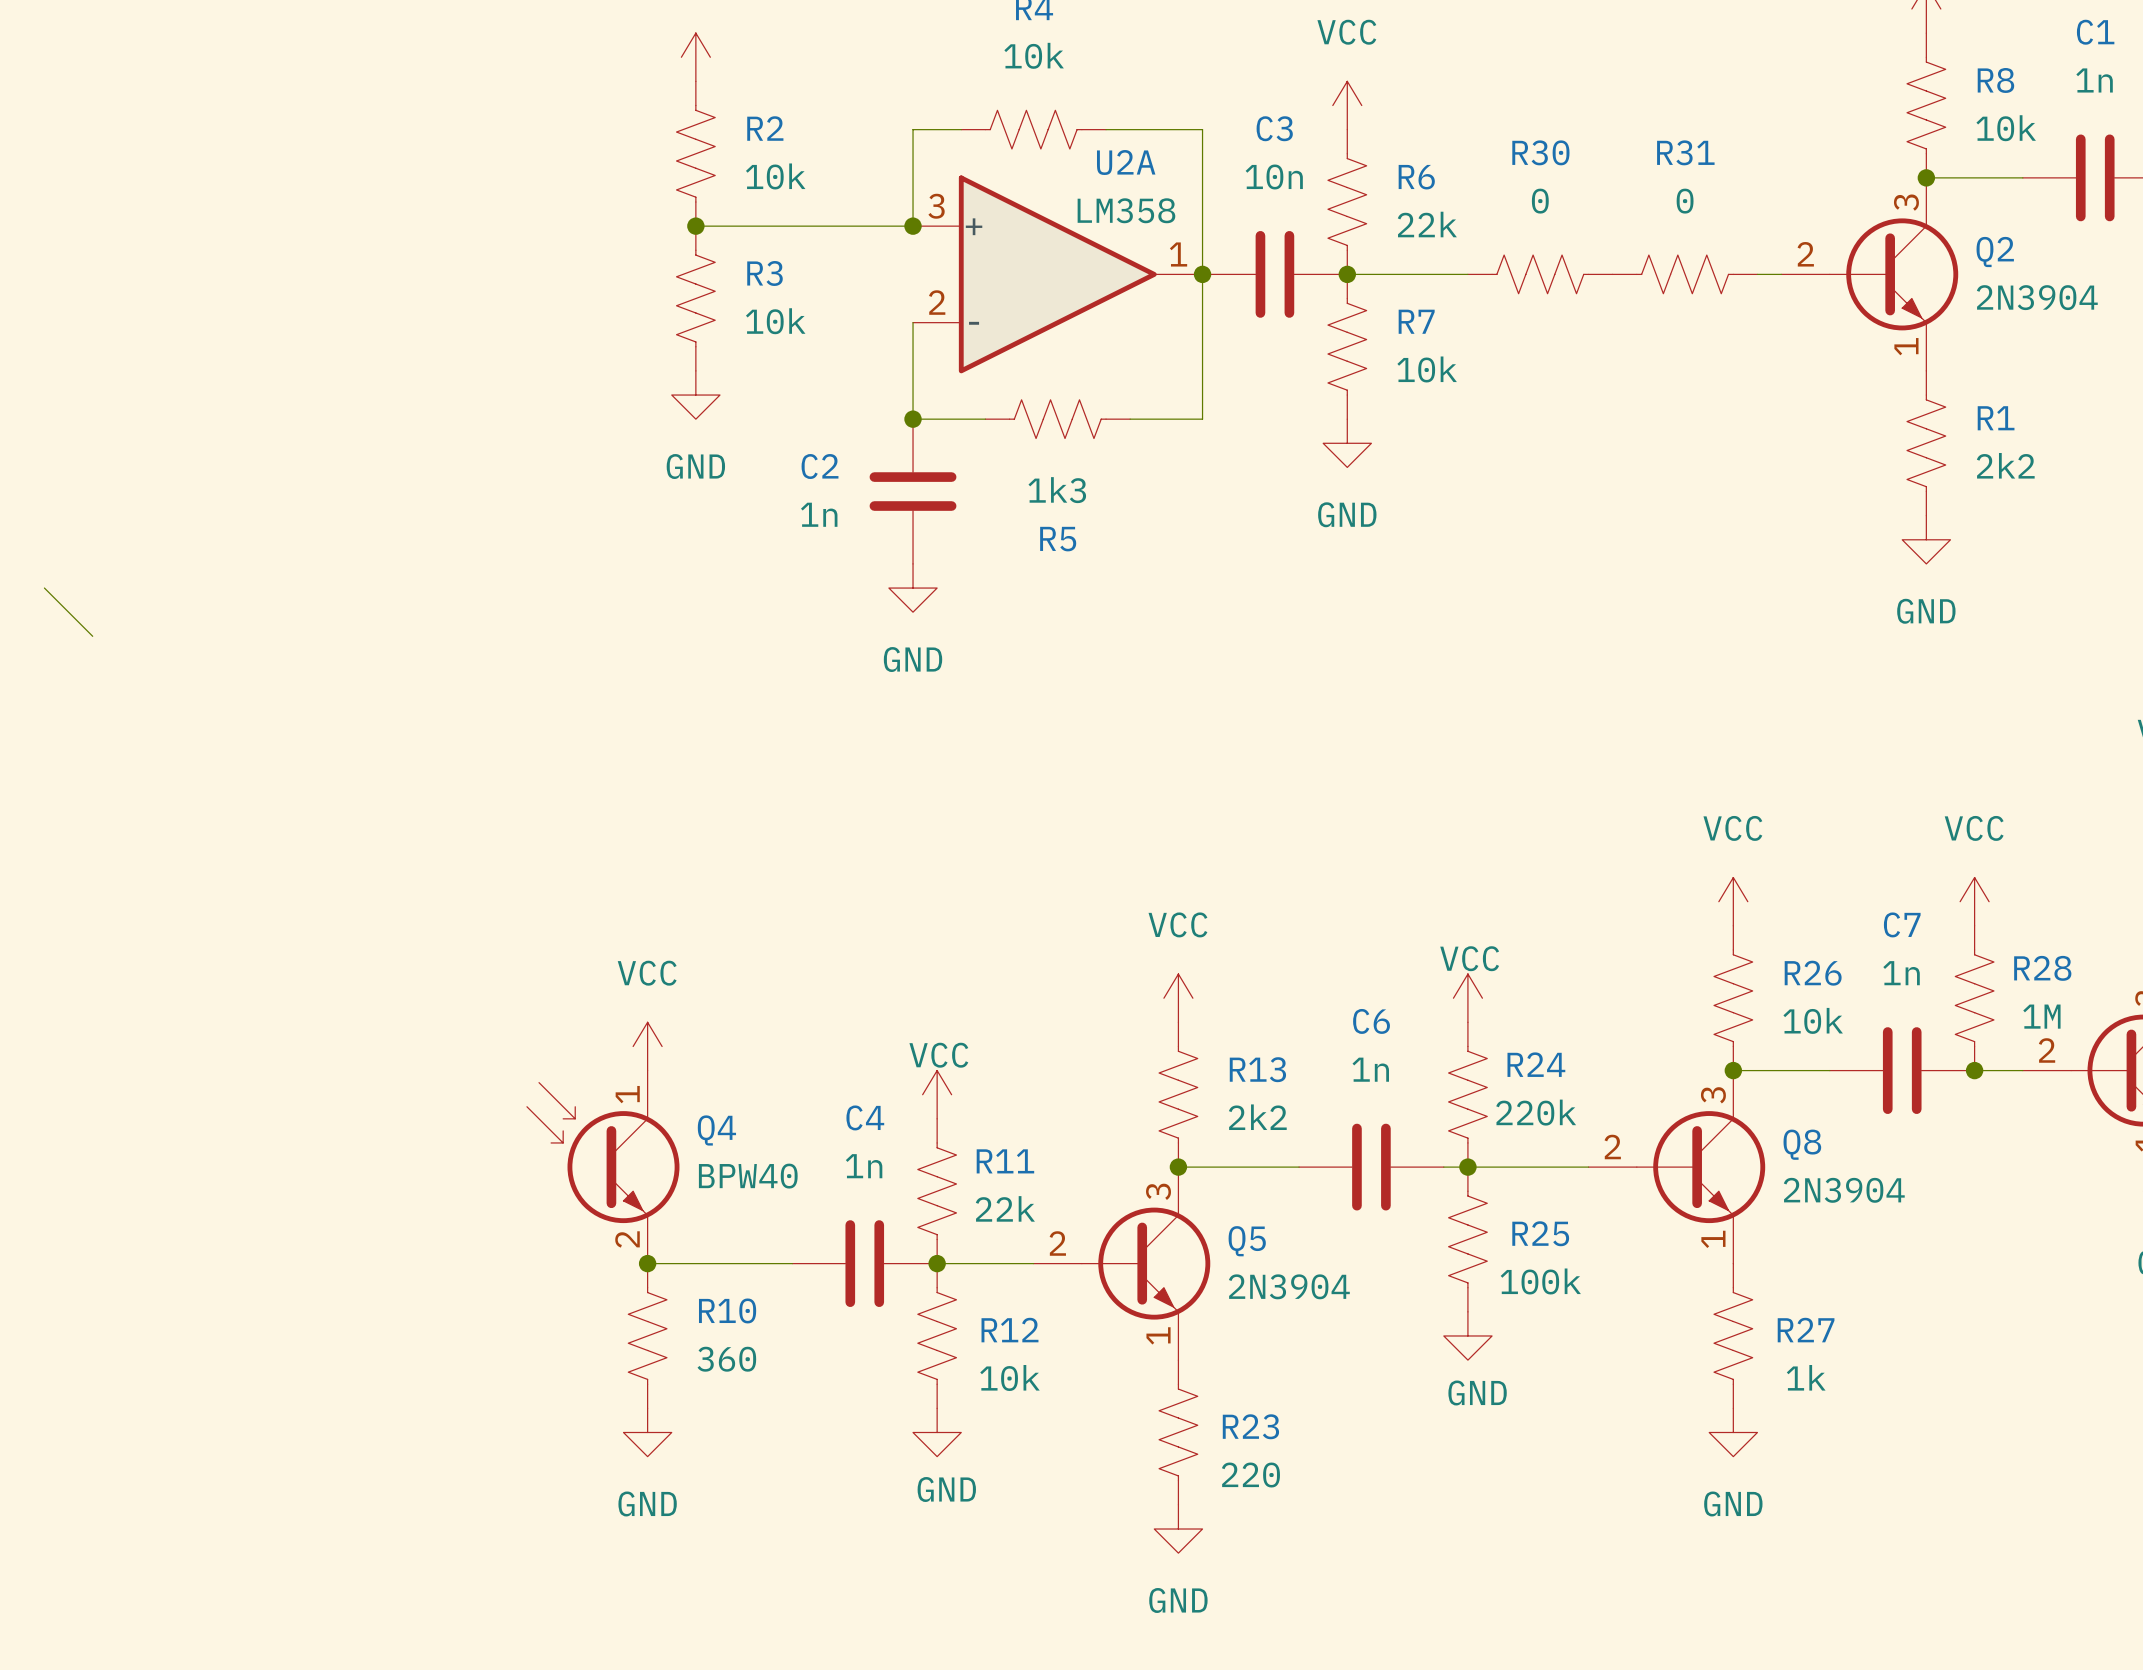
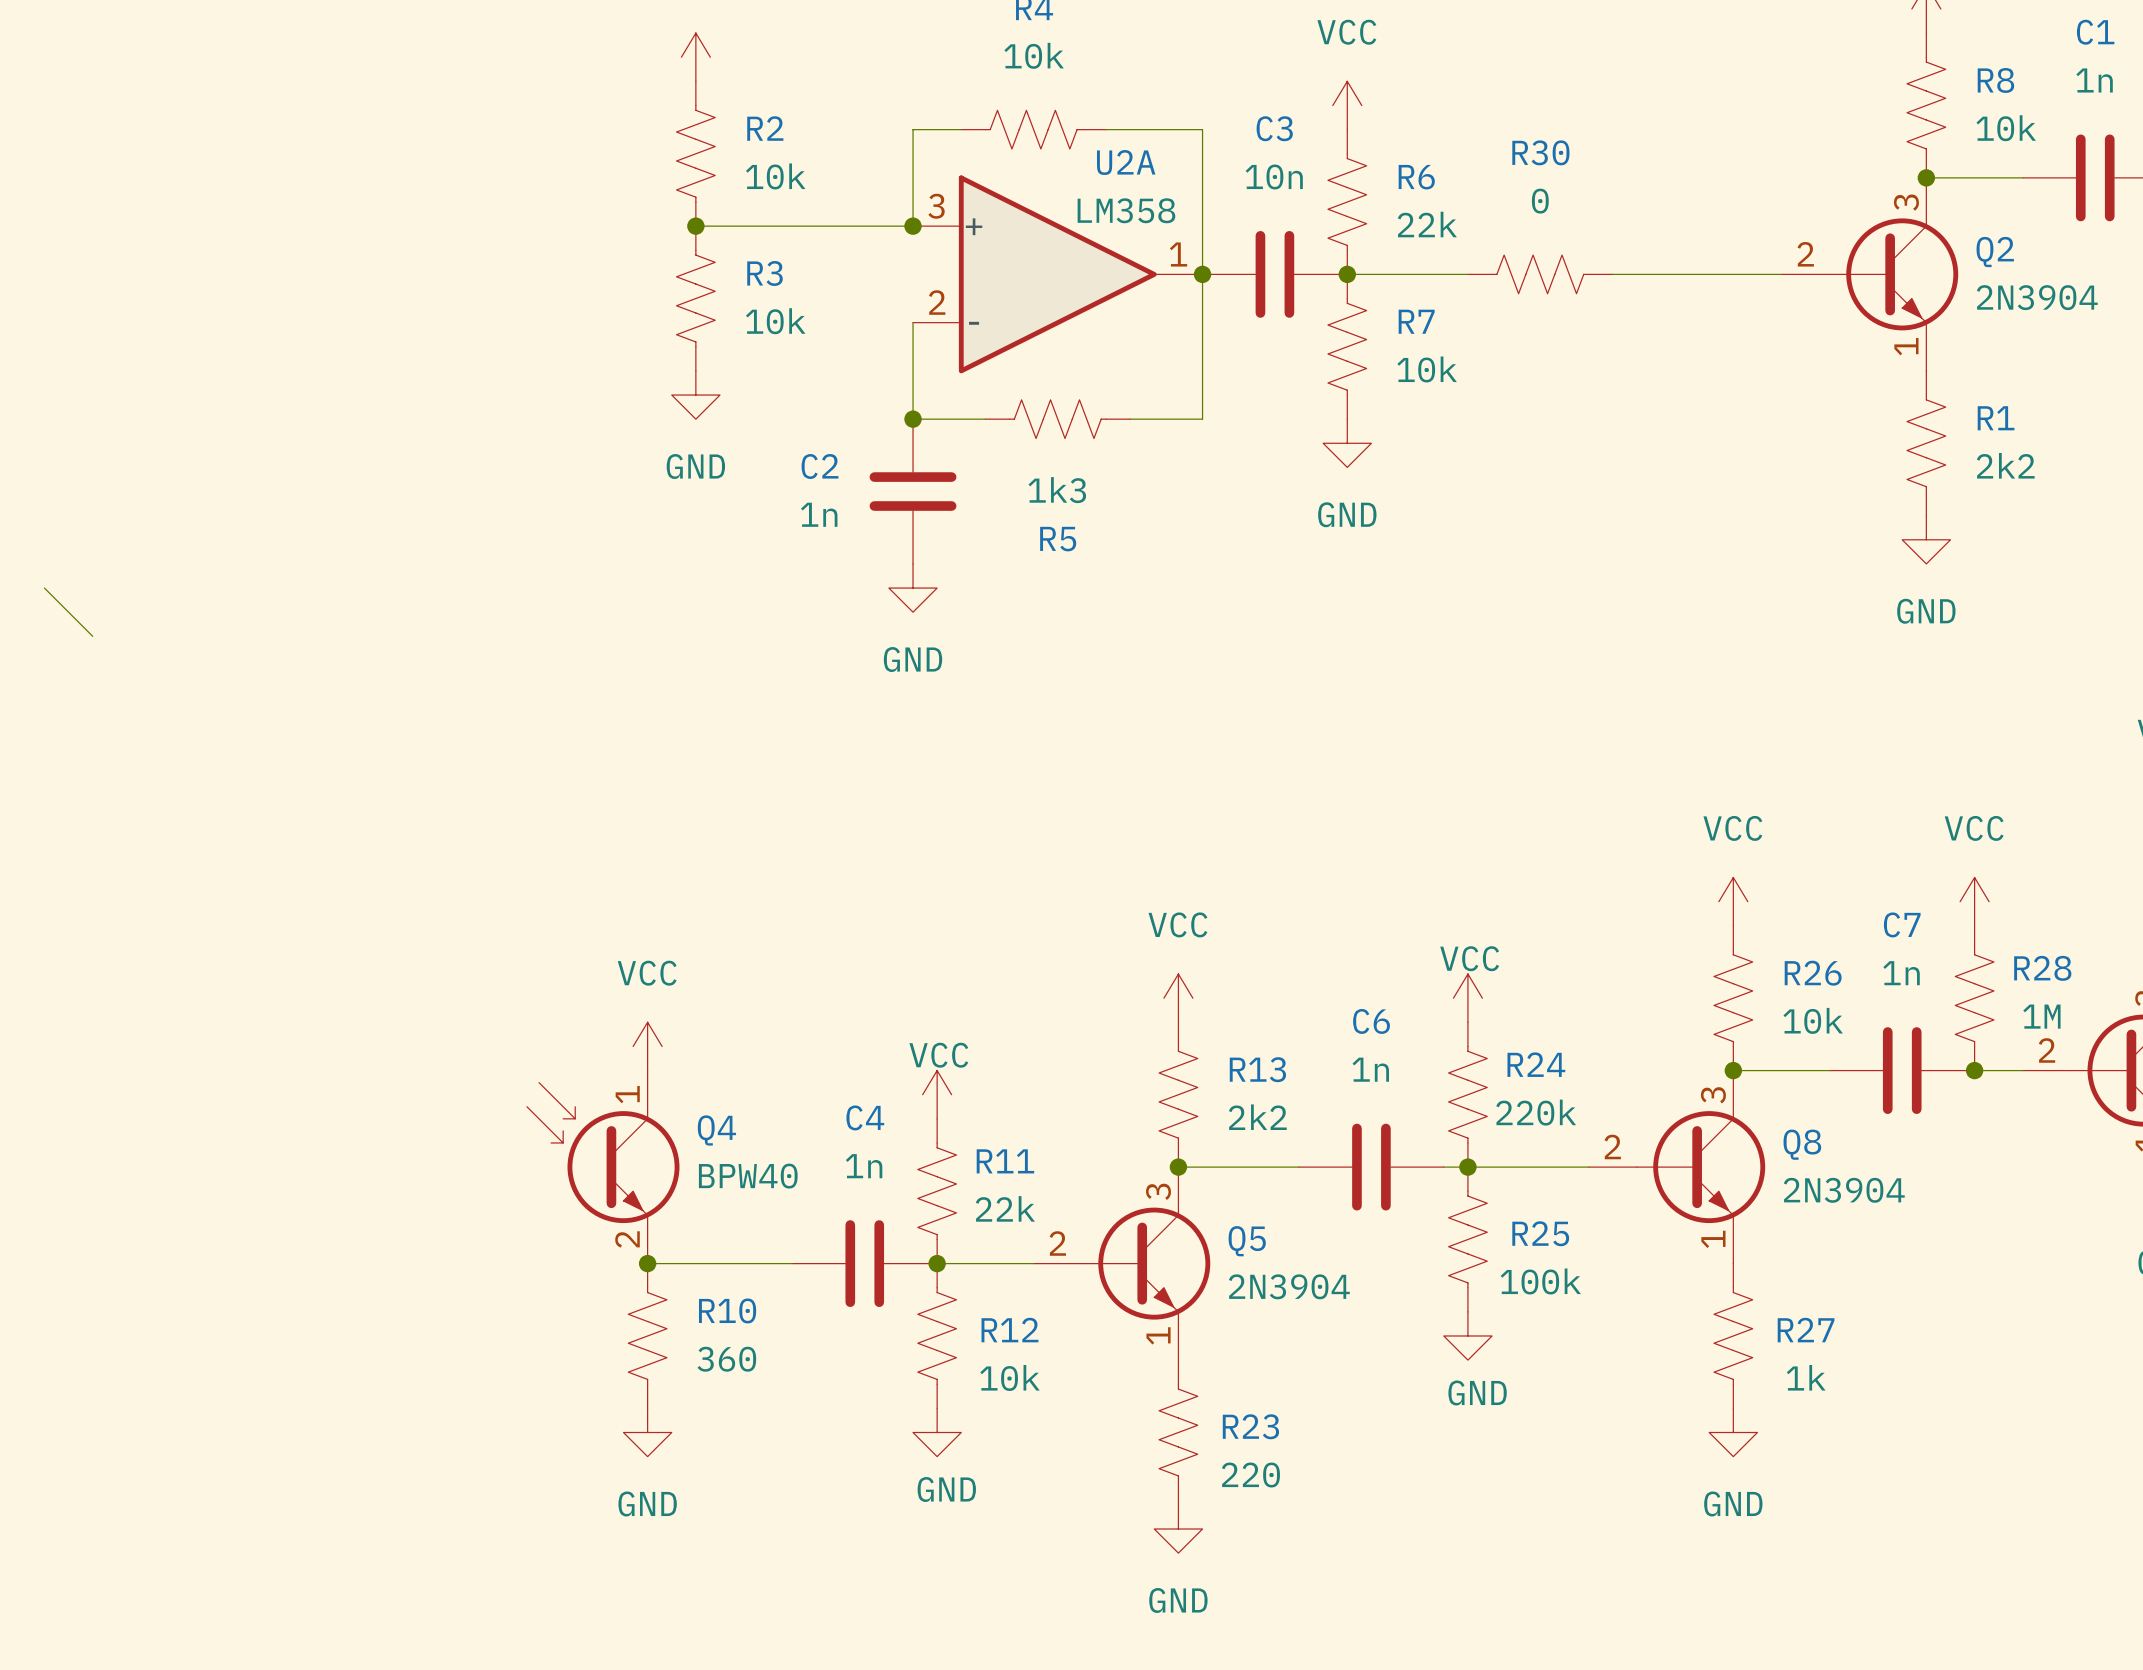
wire: none -> (1612, 274) (1757, 274)
R31: 0 (1685, 274) -> none

